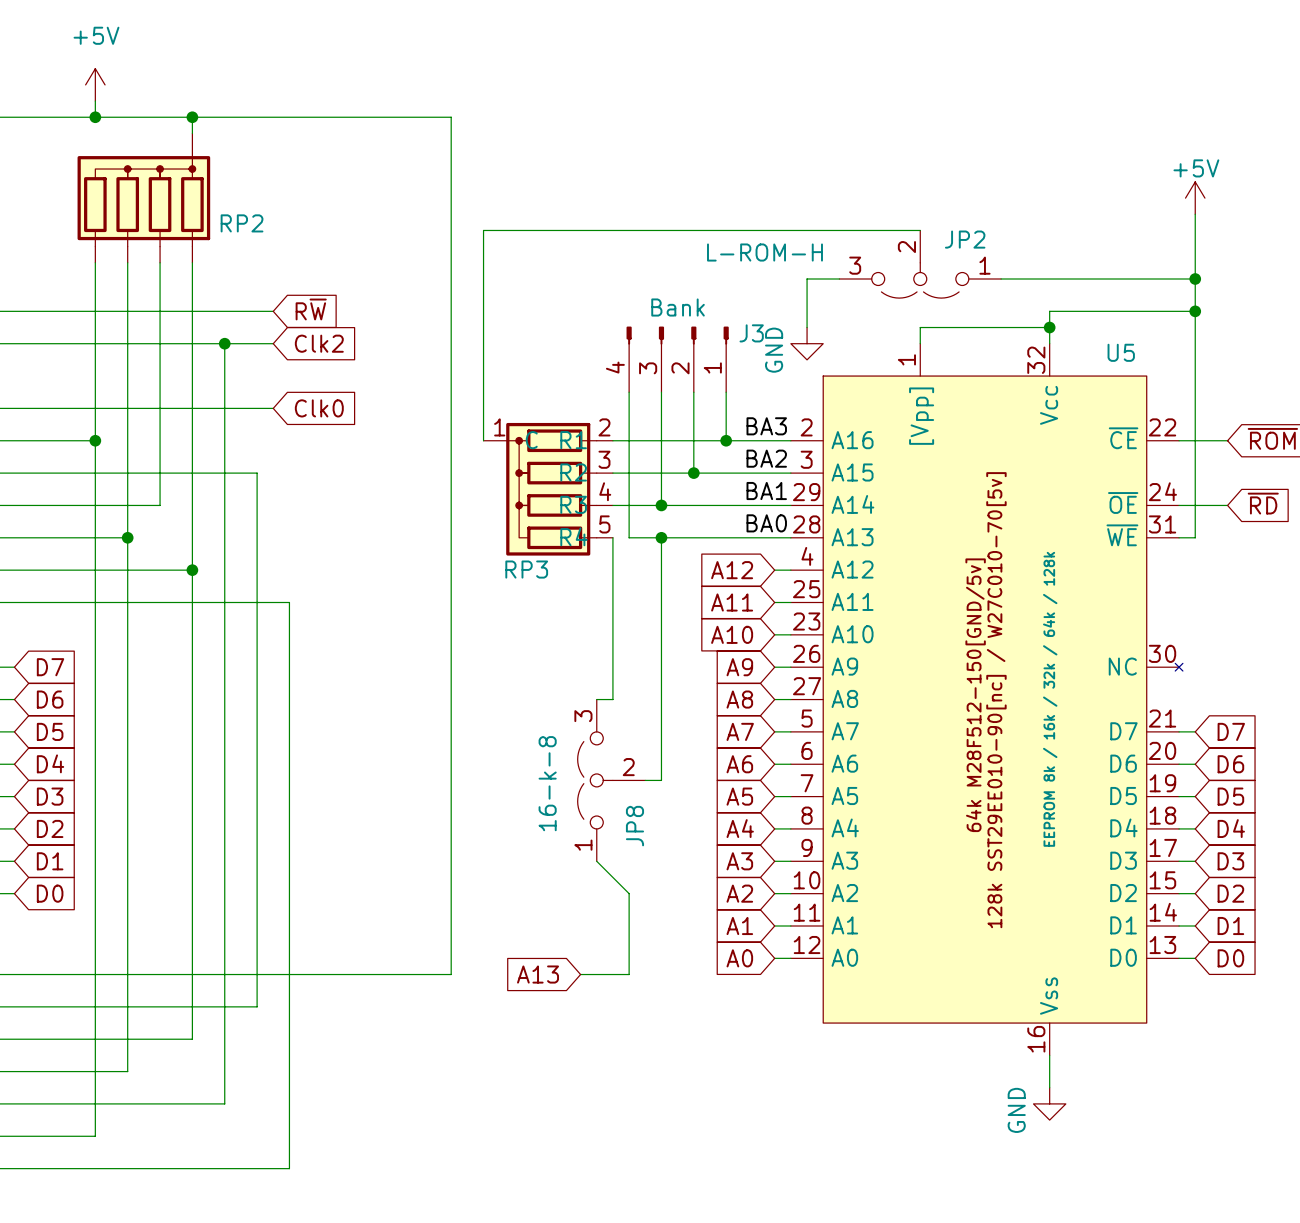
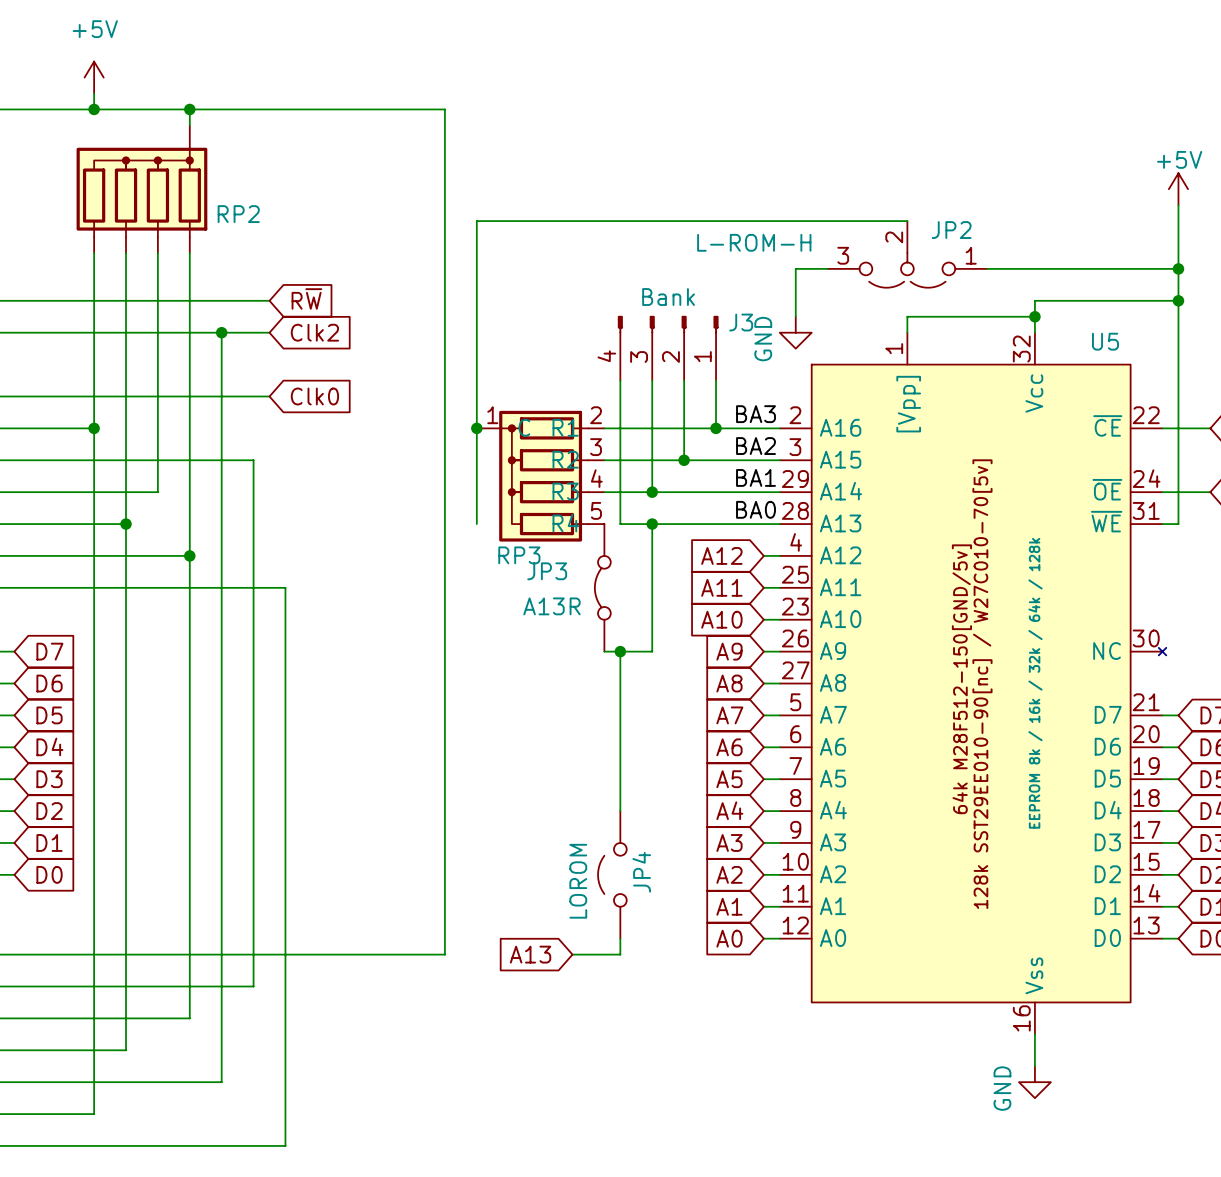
wire: none -> (476, 428) (476, 524)
junction: none -> (476, 428)
wire: (612, 537) (612, 699) (596, 699) -> none
JP3: none -> A13R (602, 587)
wire: none -> (620, 651) (620, 811)
junction: none -> (620, 651)
wire: (661, 667) (661, 780) (645, 780) -> (652, 651) (604, 651)
JP8: 16-k-8 (611, 780) -> none
wire: (596, 861) (629, 893) (629, 958) -> none
JP4: none -> LOROM (612, 874)

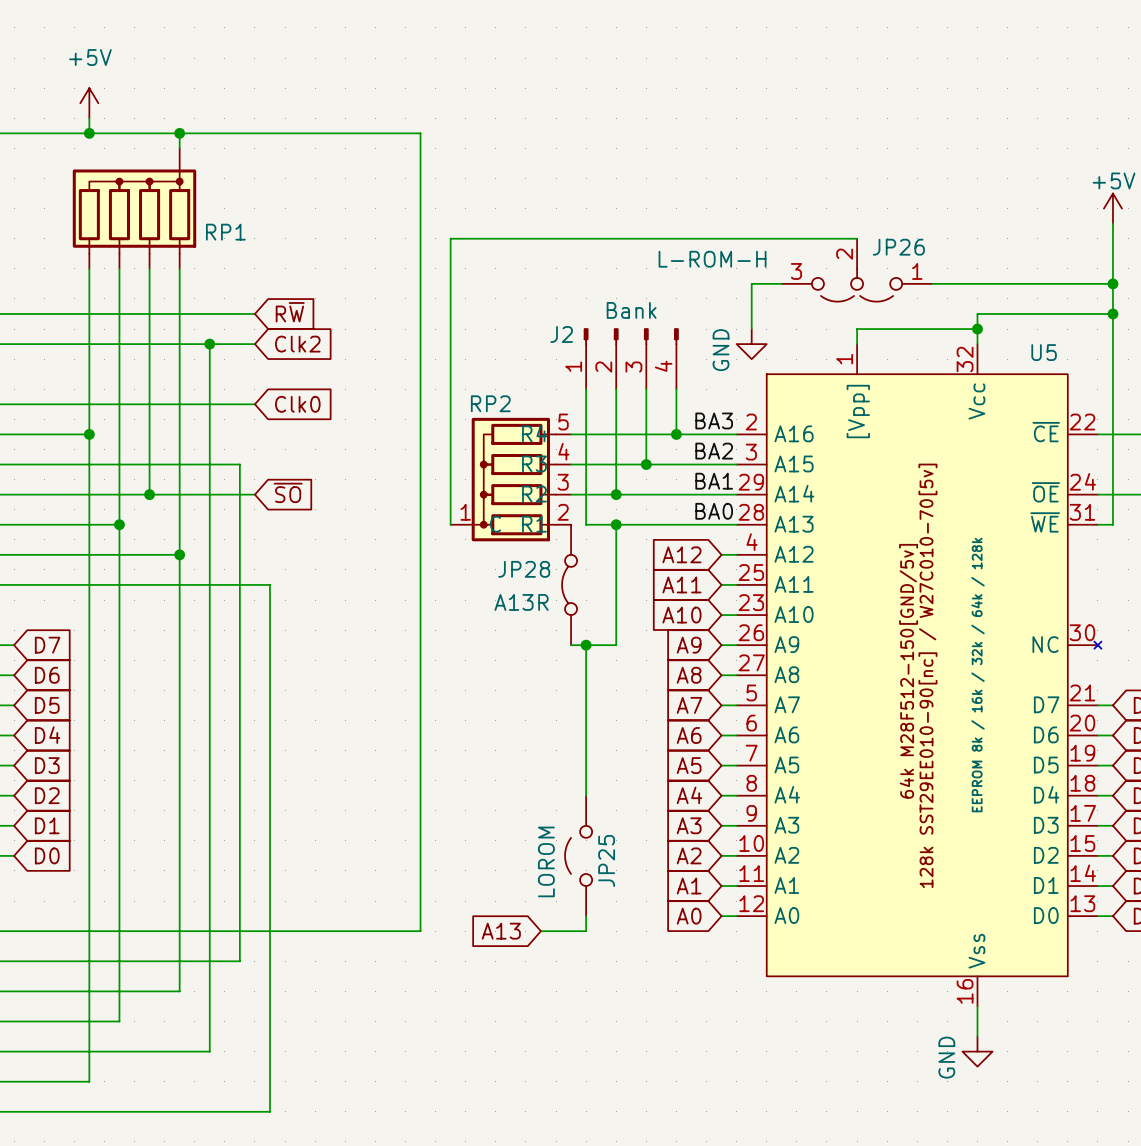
RP2 name: RP2 (238, 214) -> RP1 (225, 232)
JP2 name: JP2 (951, 230) -> JP26 (898, 247)
J3 name: J3 (741, 322) -> J2 (561, 334)
J3 flip: as is (668, 324) -> left-right (631, 336)
junction: (476, 428) -> none
RP3: (540, 476) -> none
RP2: none -> (510, 479)
global label: none -> ~{SO} (288, 492)
wire: none -> (149, 494) (254, 494)
junction: none -> (149, 494)
JP3 name: JP3 (547, 571) -> JP28 (524, 569)
JP4 name: JP4 (641, 872) -> JP25 (606, 860)

